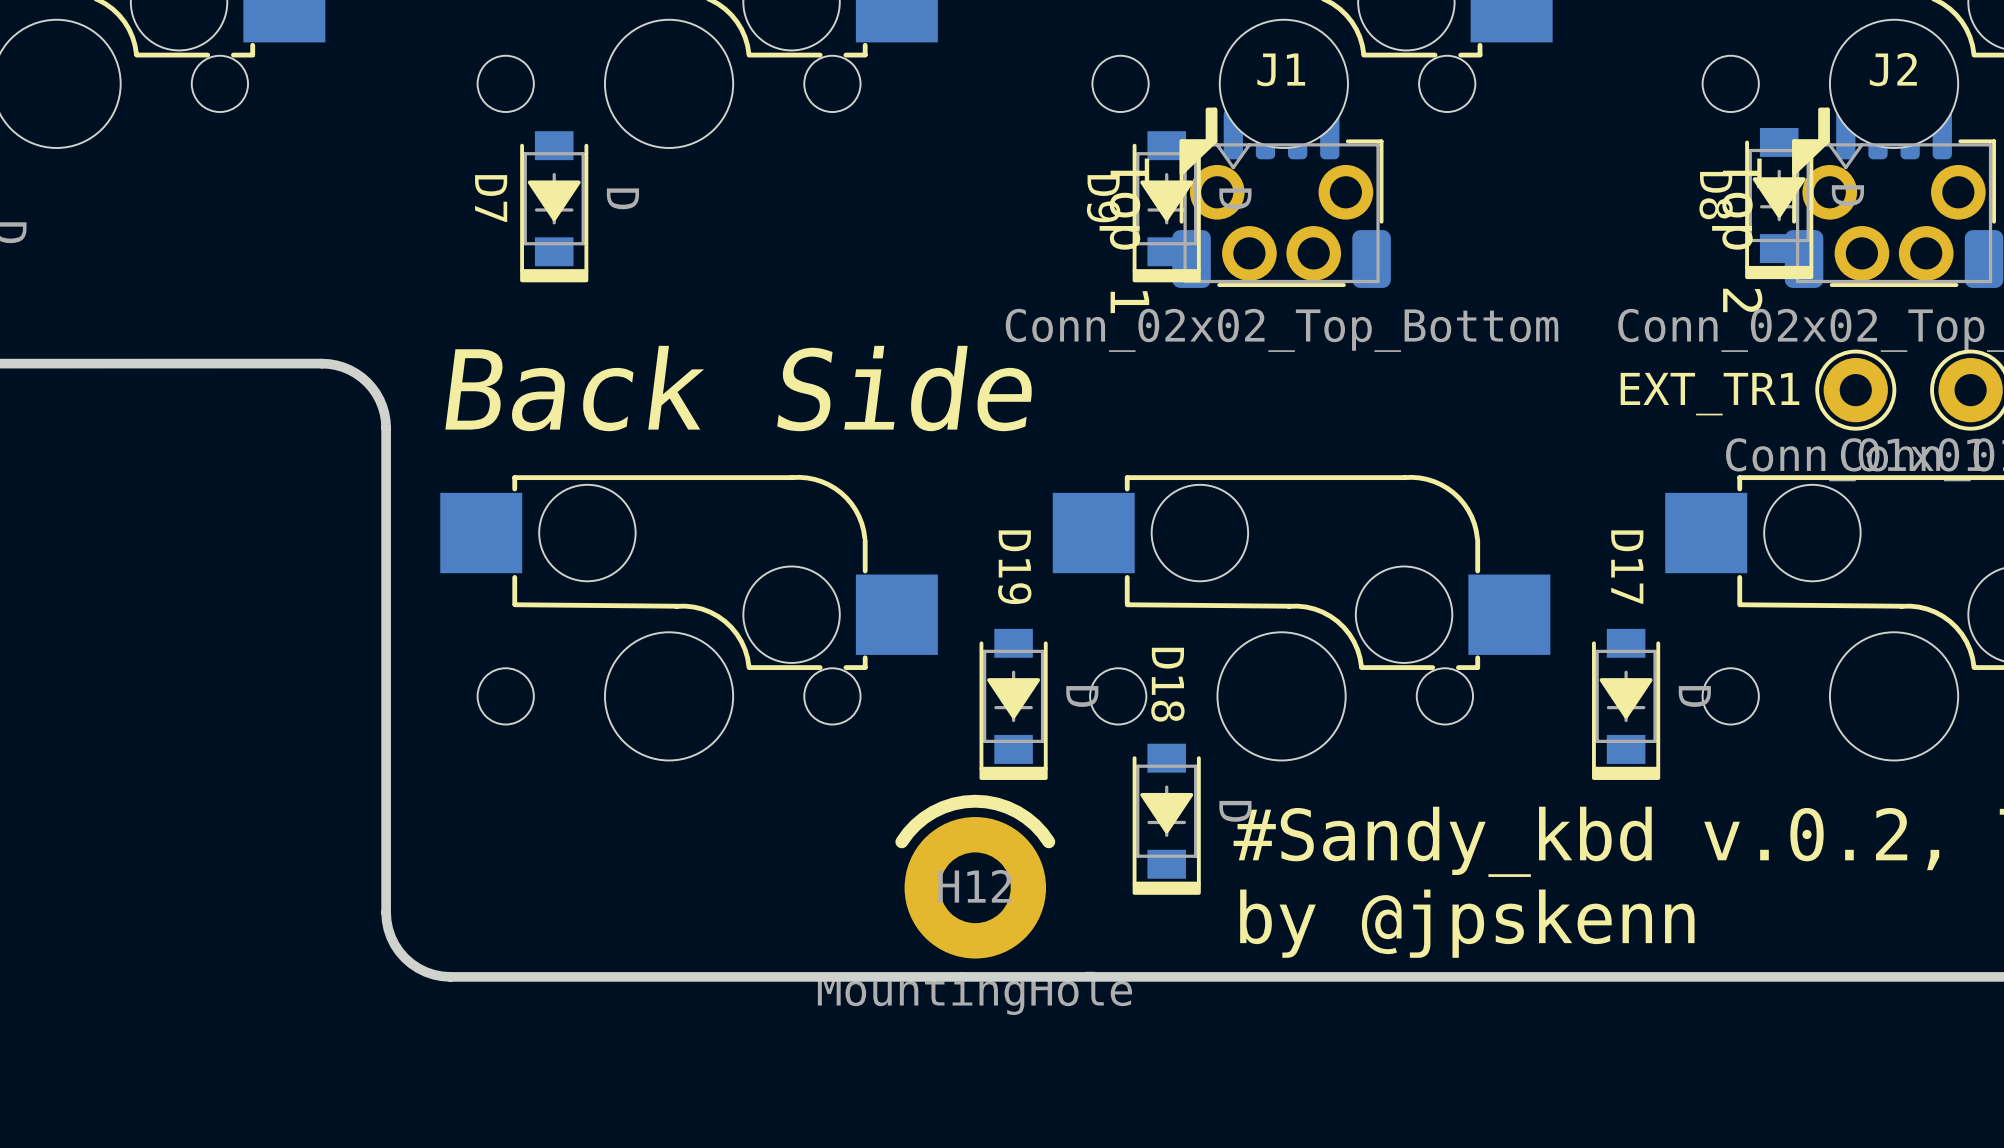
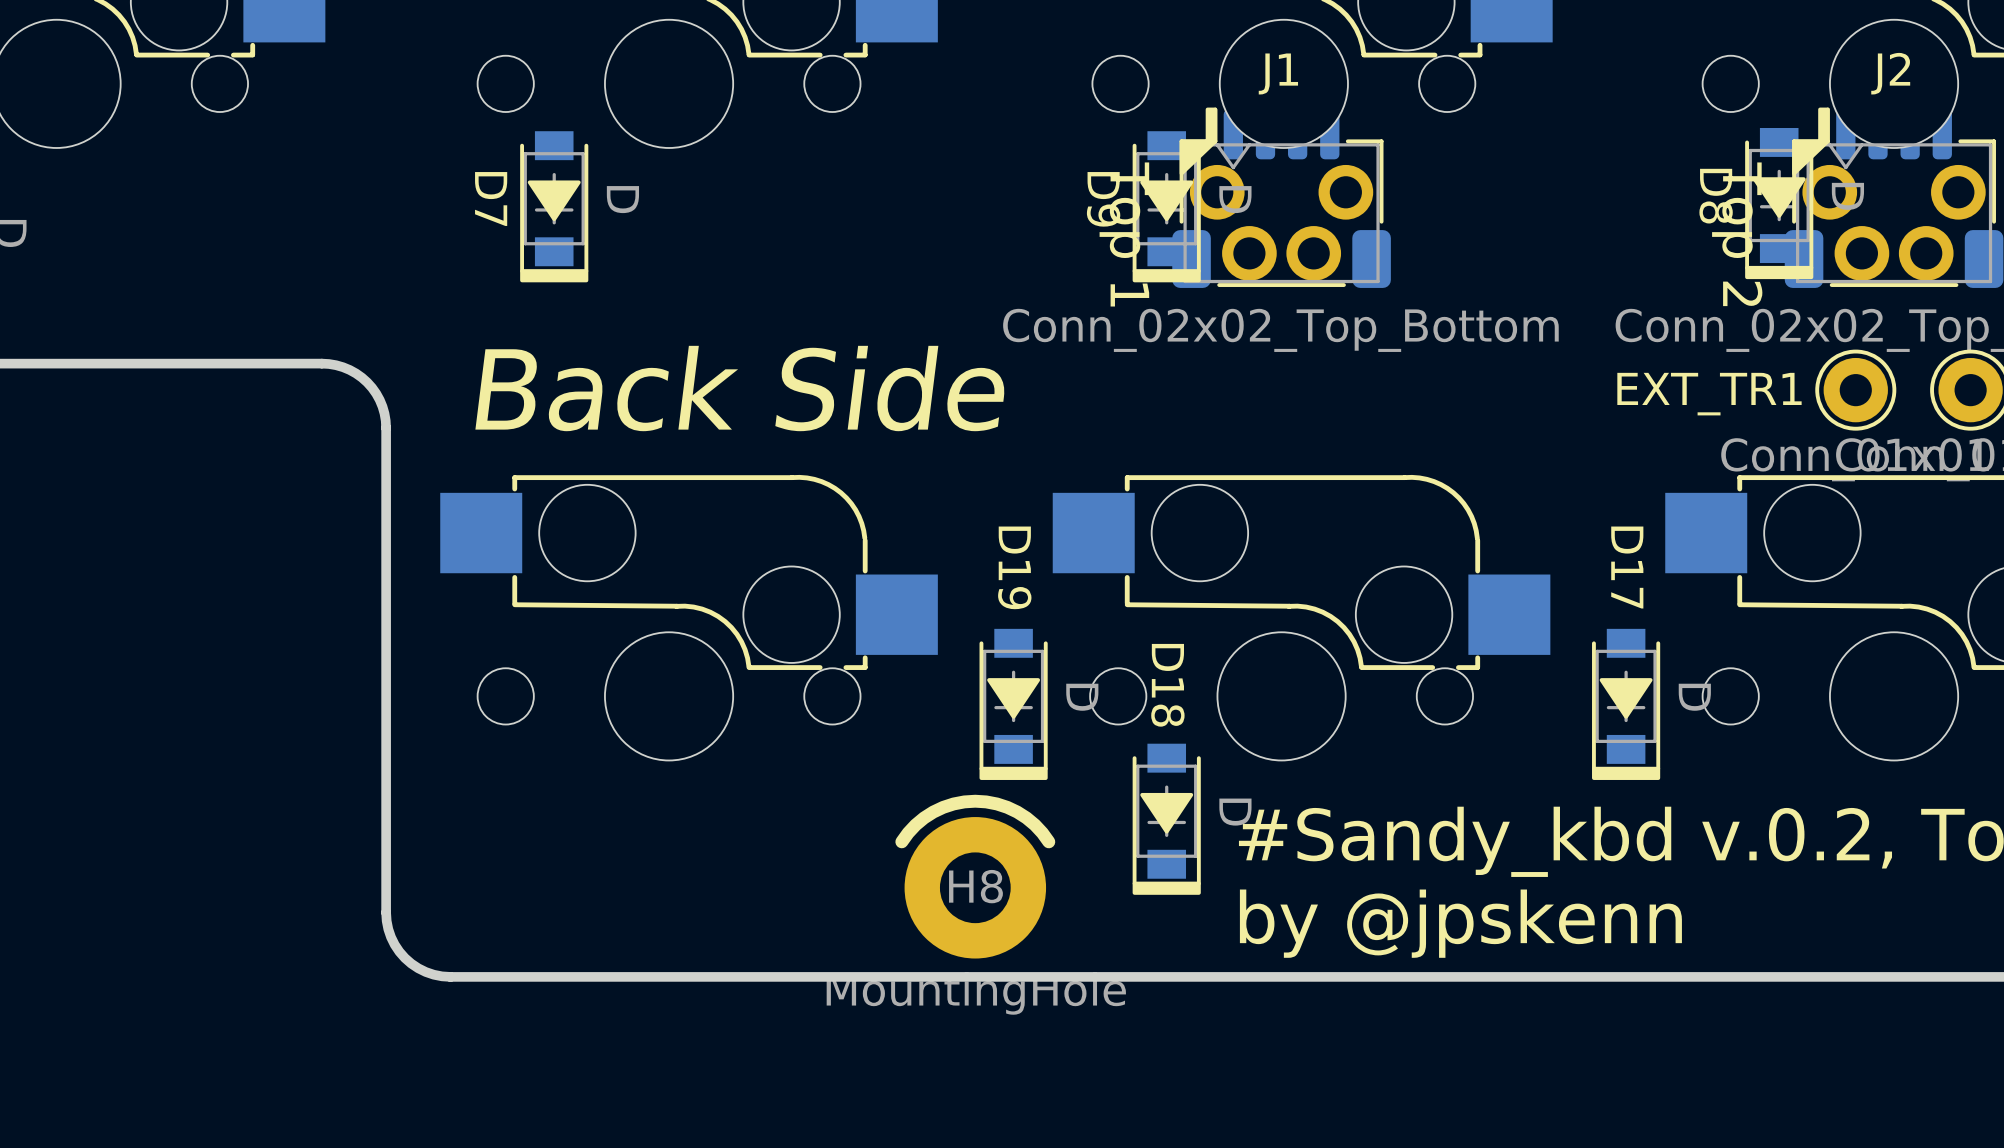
H12 name: H12 (974, 886) -> H8 (975, 886)

